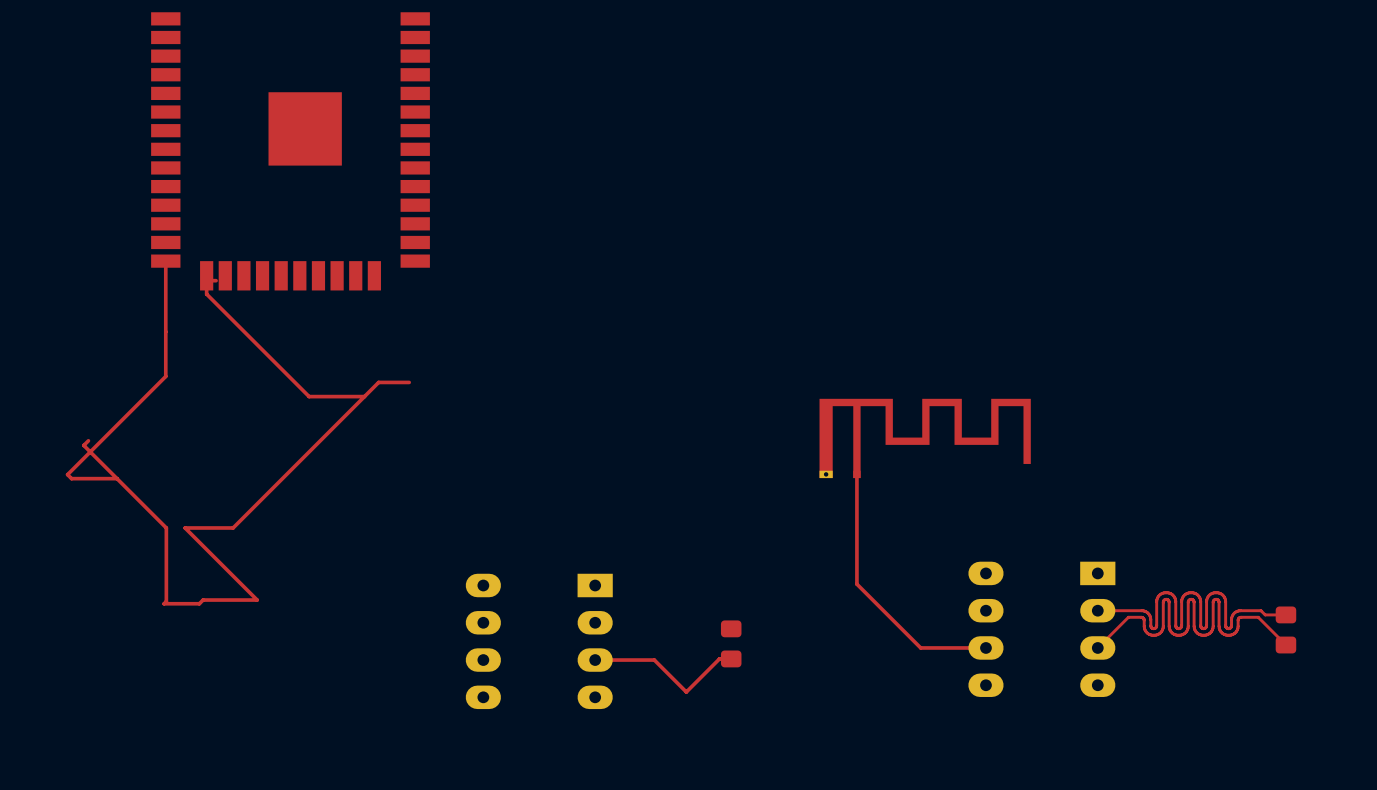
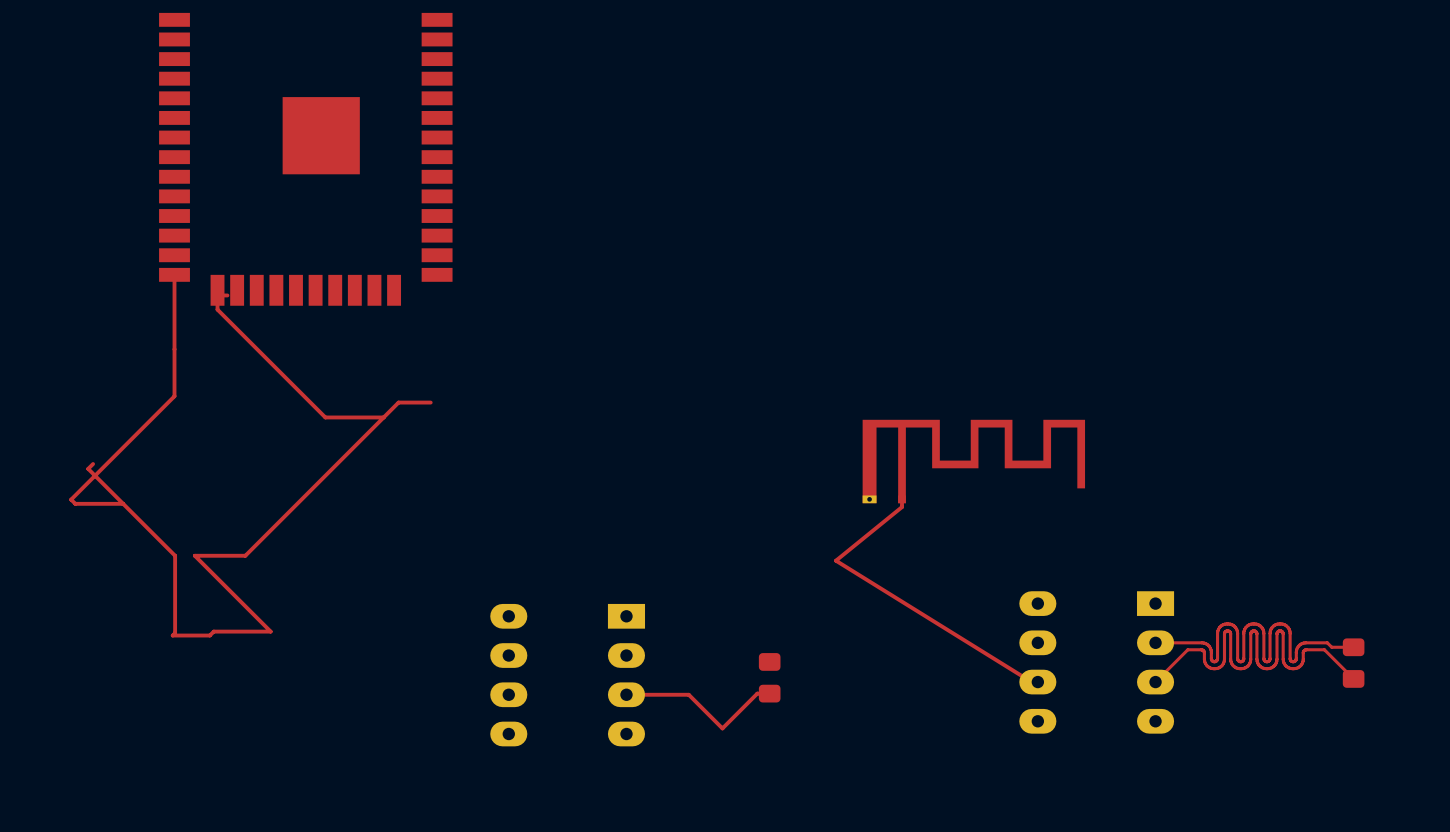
top track: (856, 481) (856, 584) (920, 647) (980, 647) -> (902, 507) (835, 560) (1031, 682)

